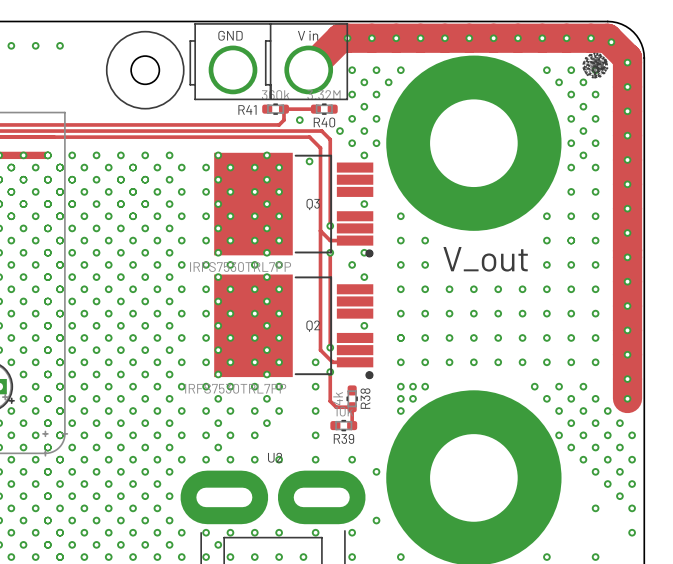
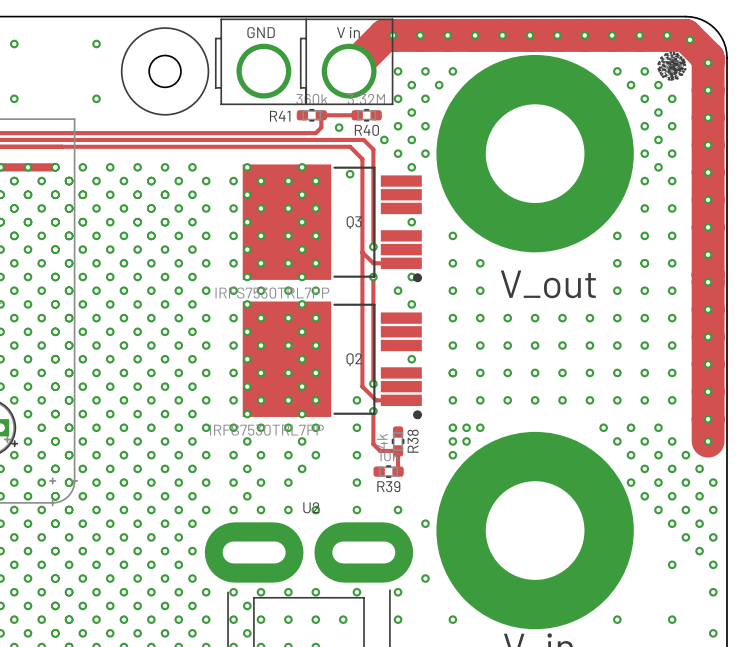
via: (35, 45) -> none
via: (60, 45) -> none
via: none -> (96, 44)
via: none -> (14, 98)
via: none -> (96, 98)

